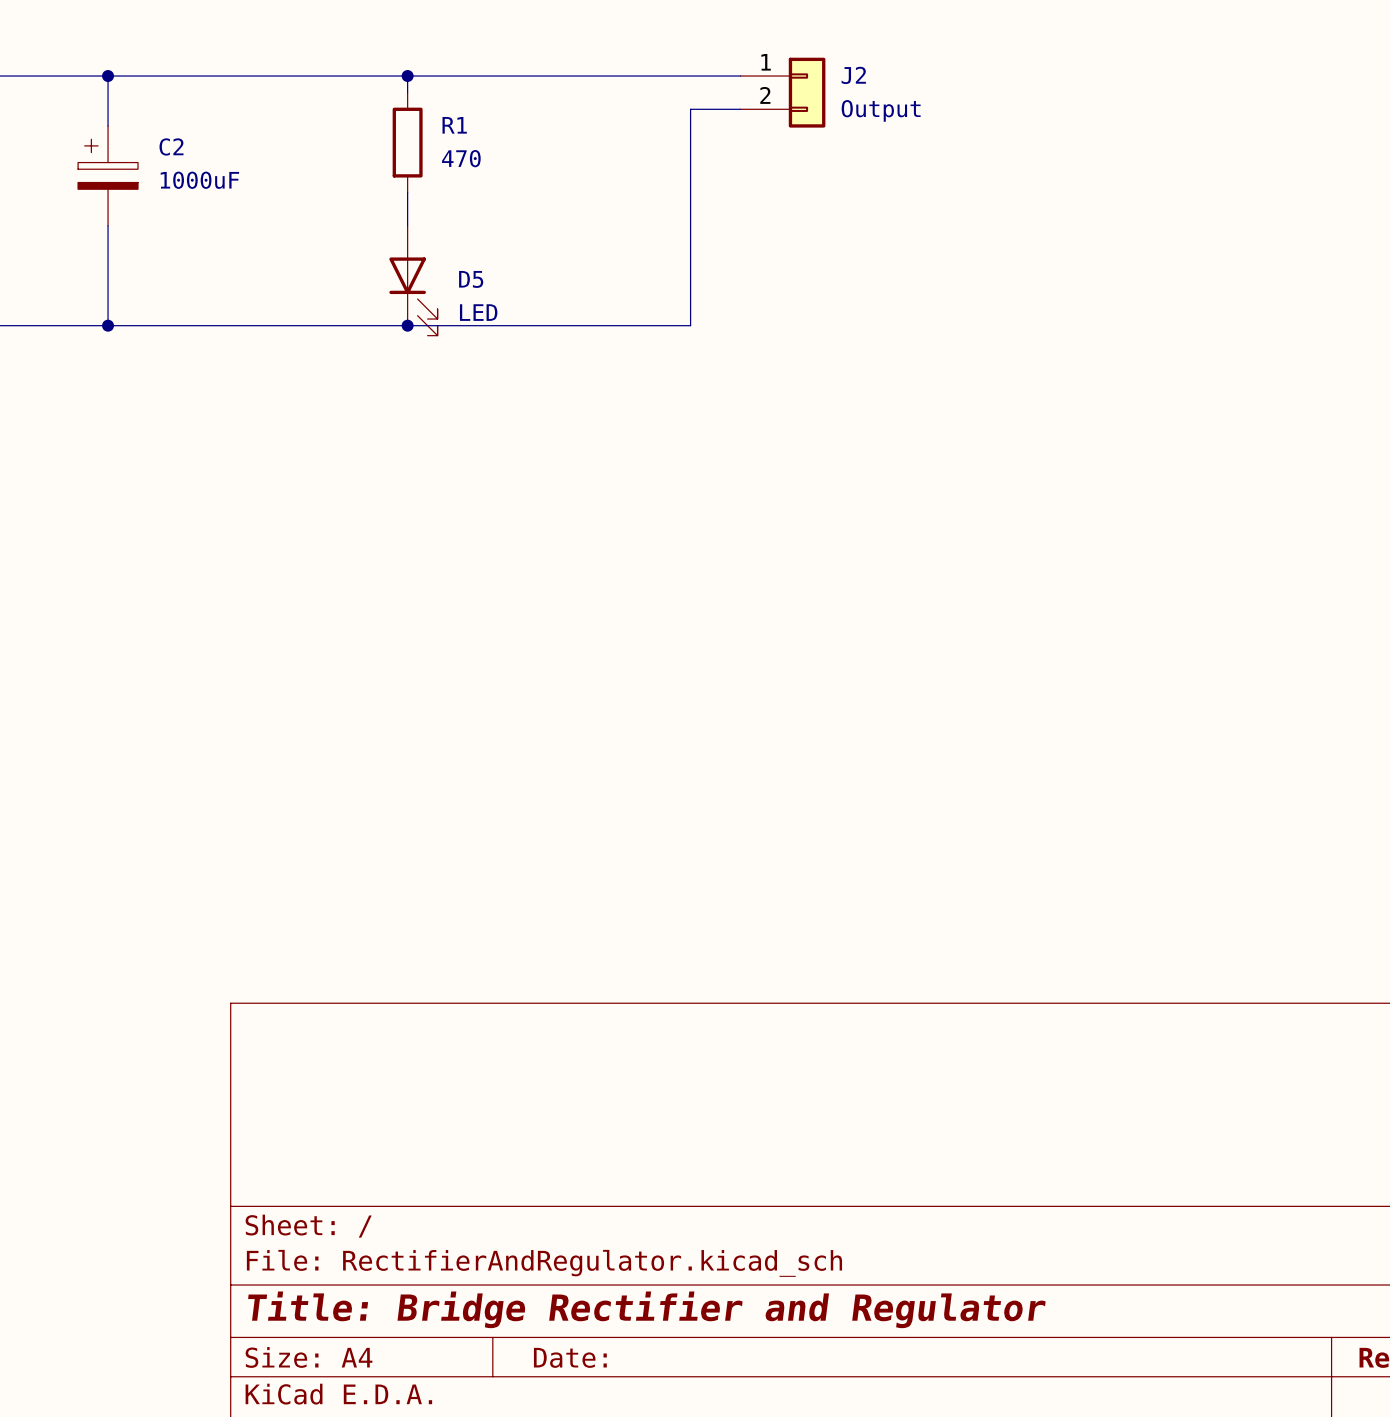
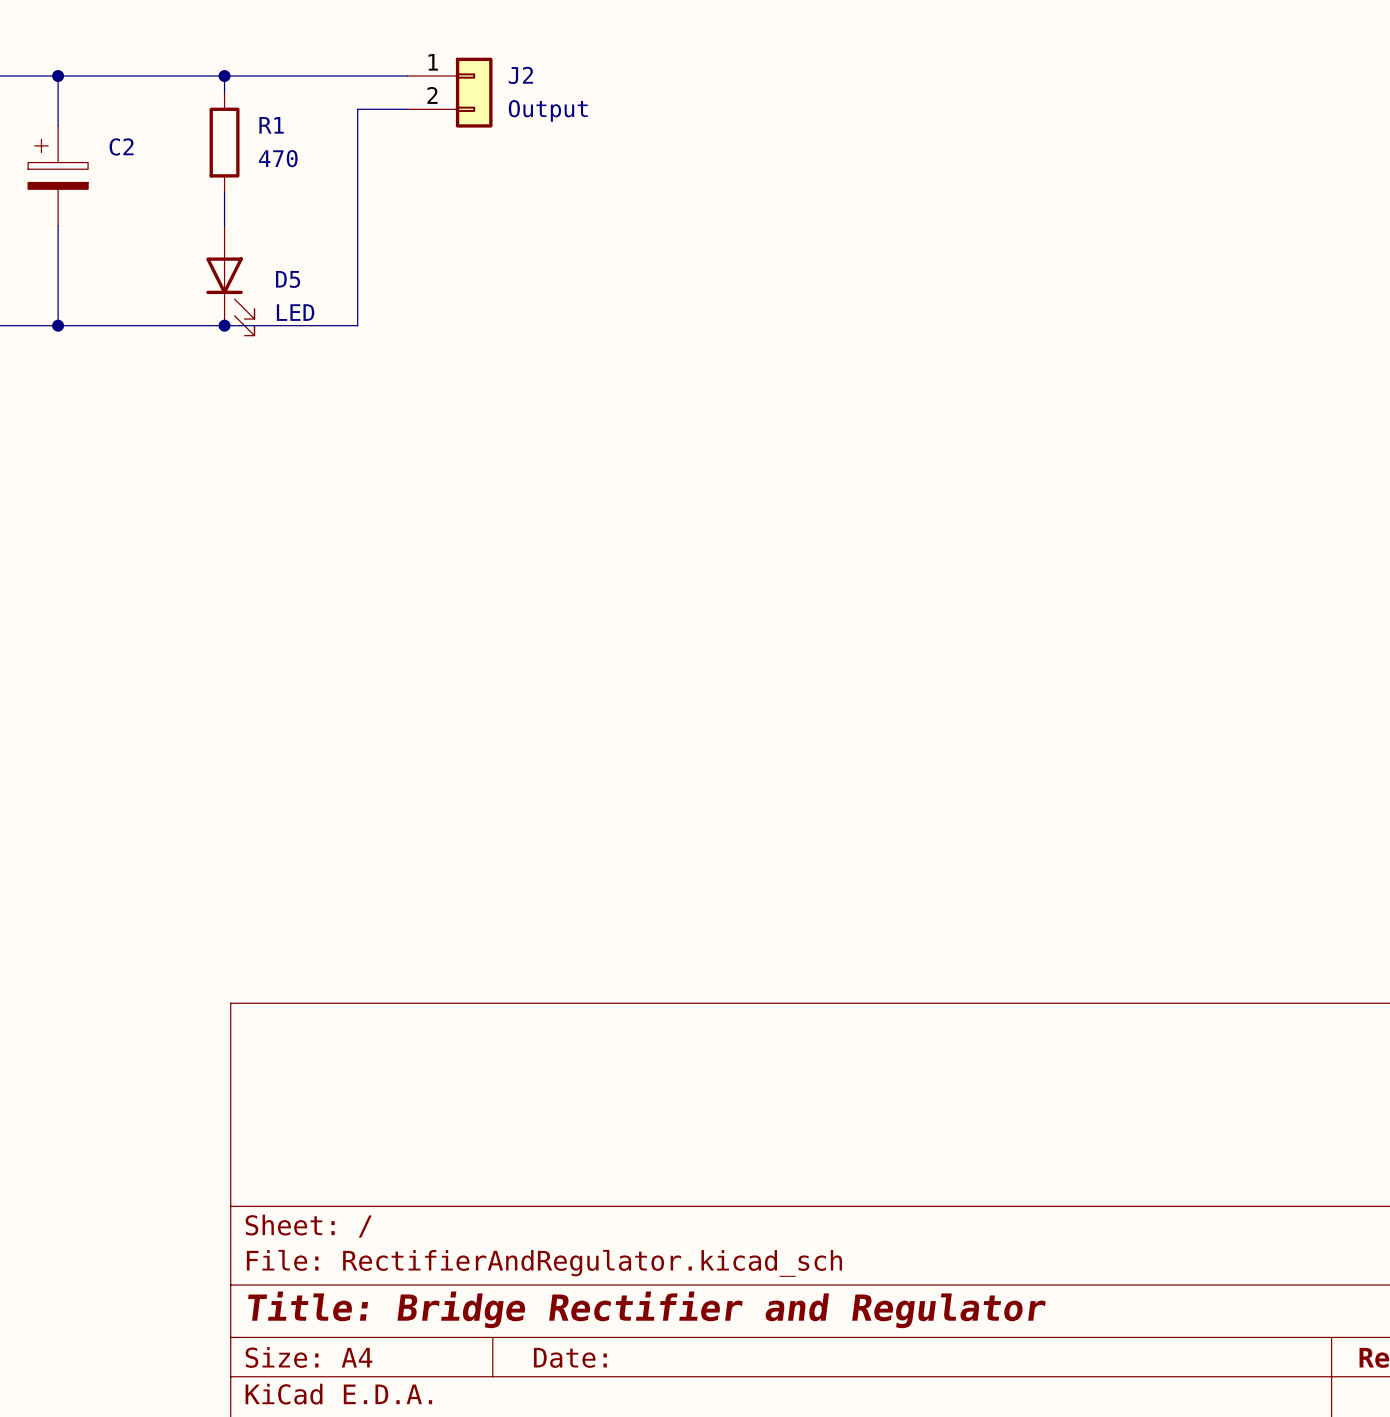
wire: (108, 76) (108, 125) -> (58, 76) (58, 125)
junction position: (108, 76) -> (58, 76)
wire: none -> (224, 76) (224, 92)
junction: none -> (224, 76)
junction: (407, 76) -> none
wire: (740, 76) (407, 76) (407, 92) -> none
J2 position: (782, 92) -> (450, 92)
wire: (740, 109) (690, 109) (690, 325) (357, 325) -> (407, 109) (357, 109) (357, 325)
R1 position: (407, 142) -> (224, 142)
C2 position: (108, 175) -> (58, 175)
C2 value: 1000uF (199, 180) -> none
wire: (407, 192) (407, 225) -> (224, 192) (224, 225)
wire: (108, 225) (108, 325) -> (58, 225) (58, 325)
D5 position: (413, 280) -> (230, 280)
junction position: (108, 325) -> (58, 325)
junction: none -> (224, 325)
junction: (407, 325) -> none

